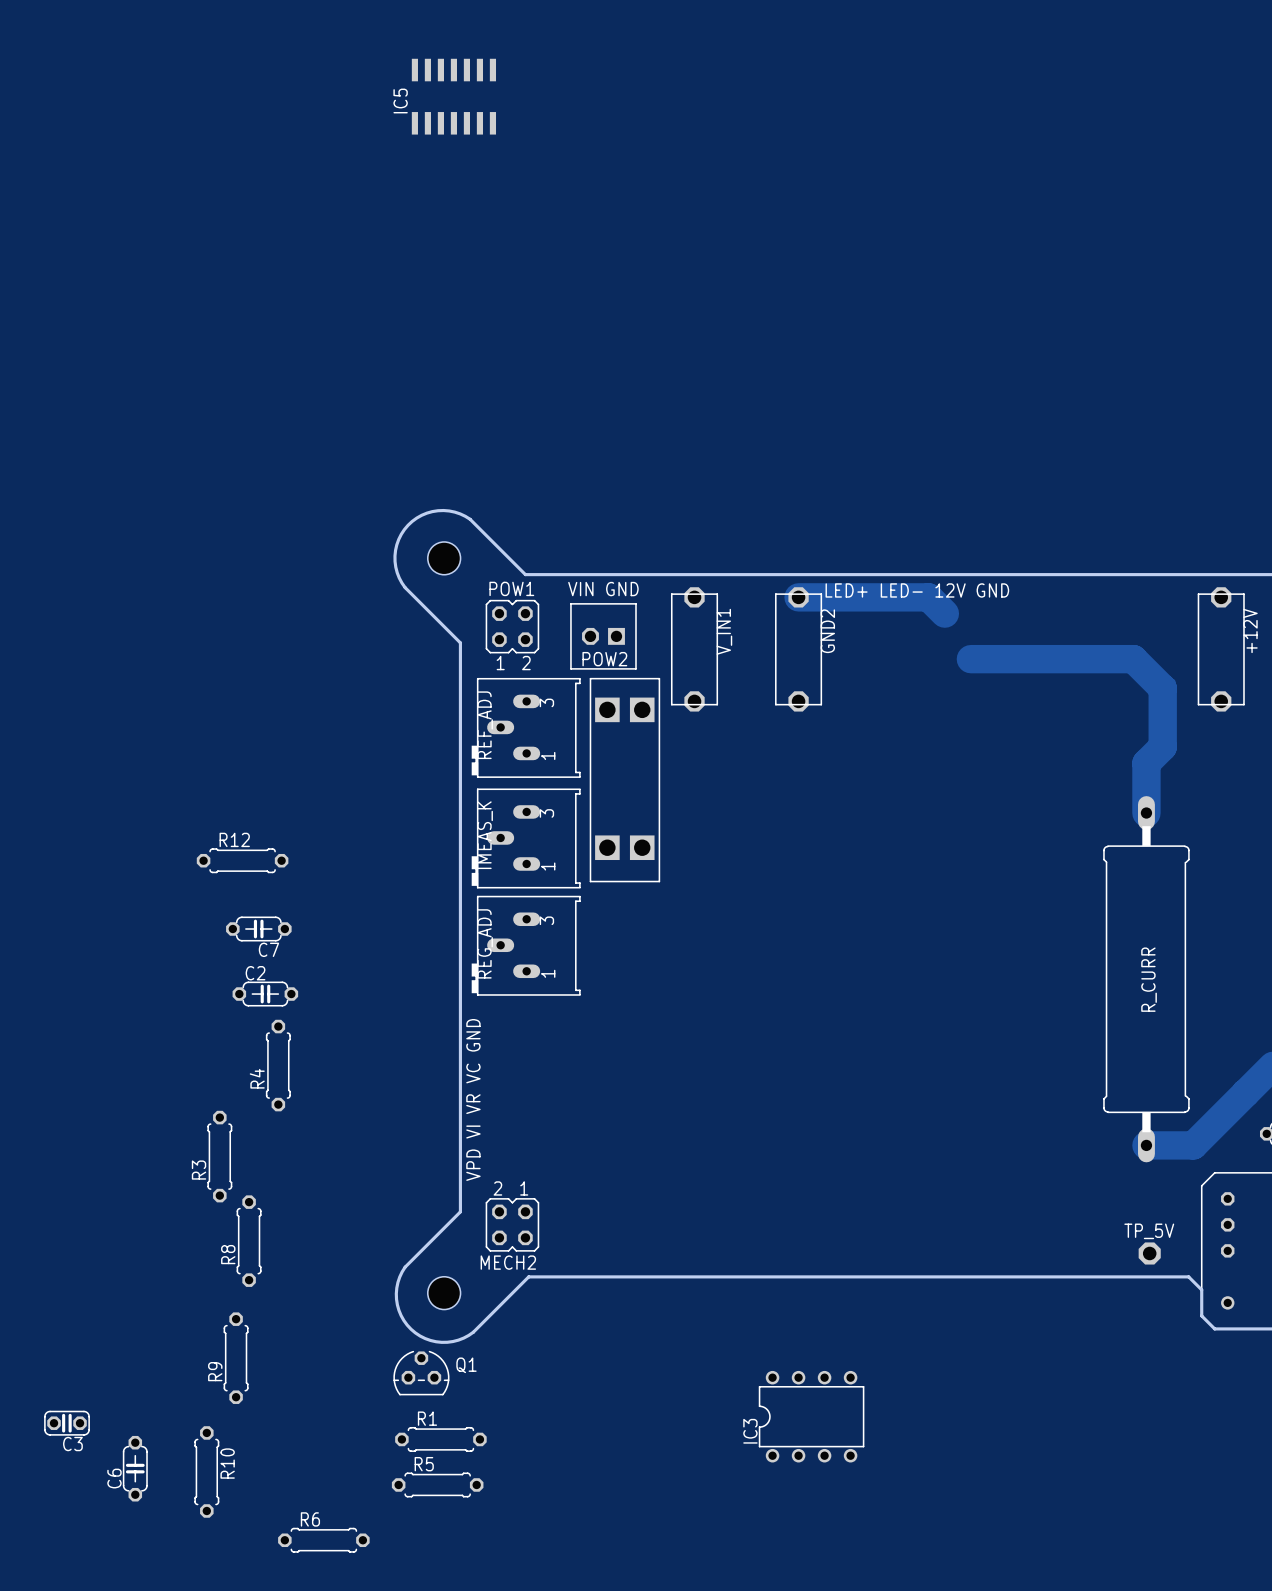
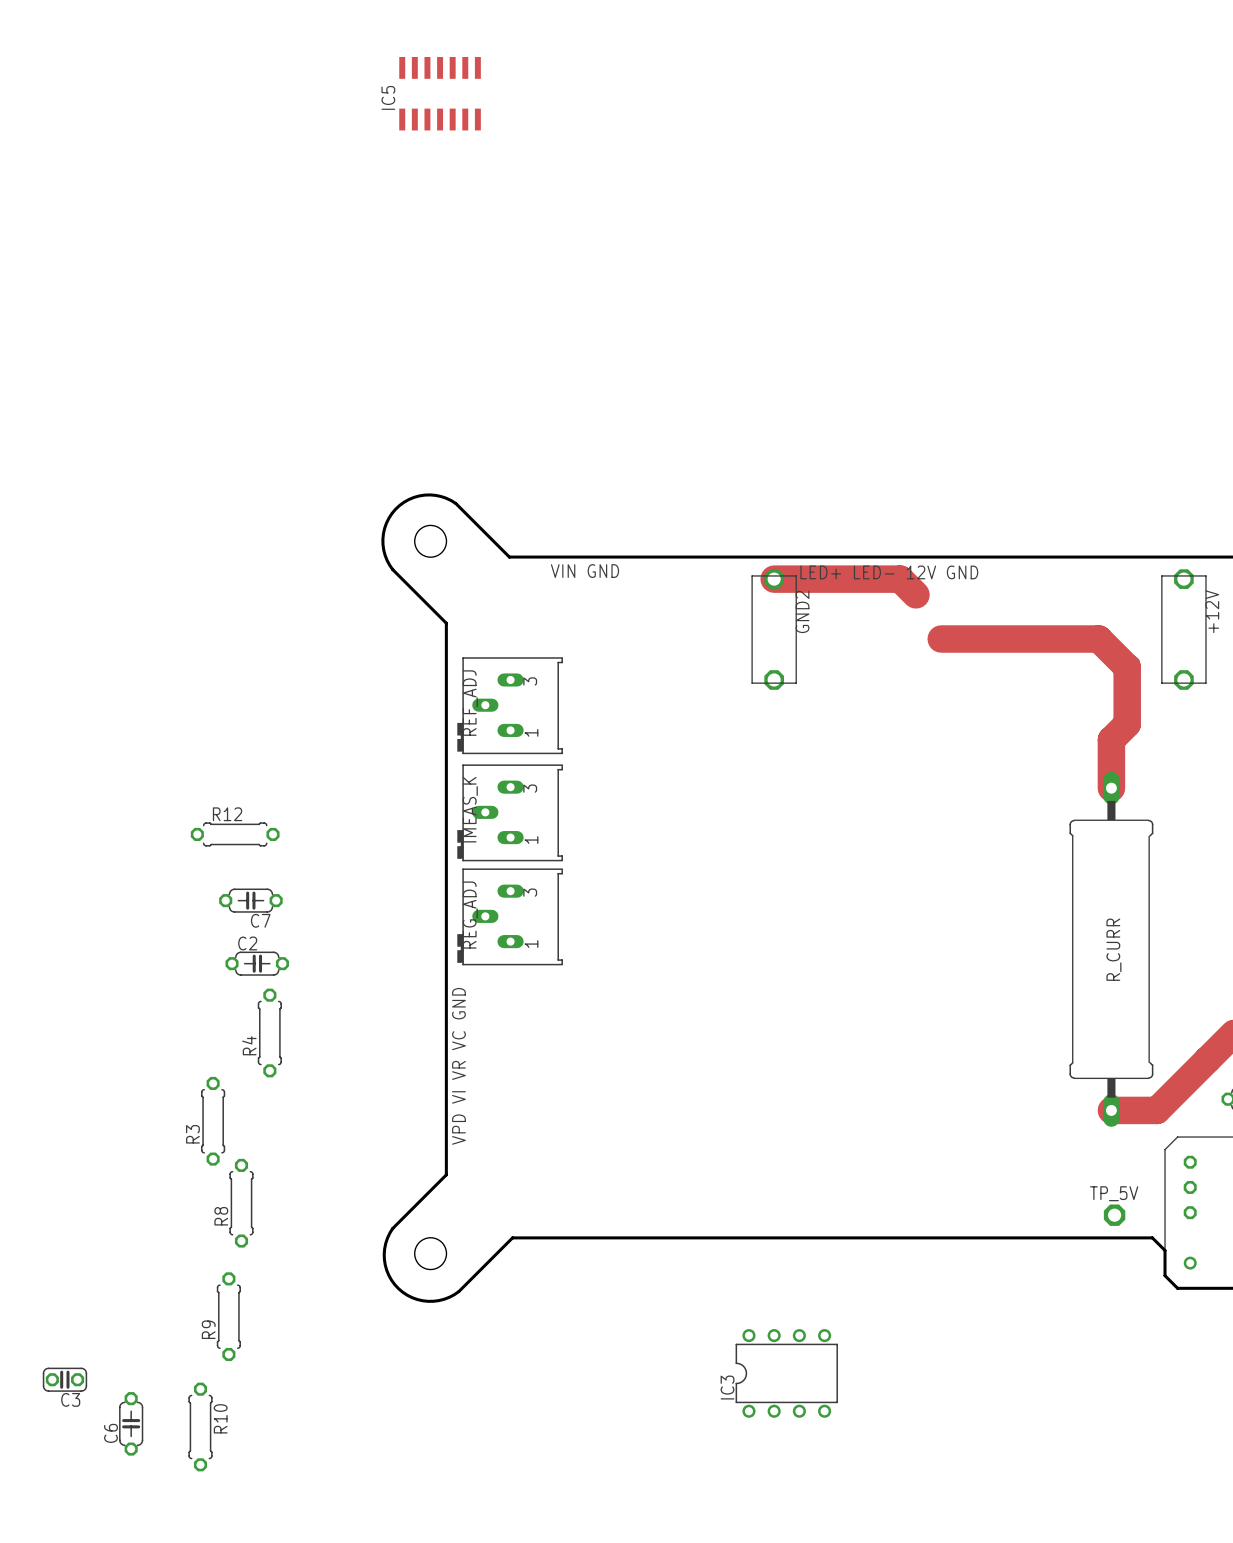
POW1: (512, 626) -> none
POW2: (603, 636) -> none
V_IN1: (694, 649) -> none
part: (624, 780) -> none
MECH2: (512, 1224) -> none
Q1: (421, 1373) -> none
R1: (440, 1439) -> none
R5: (437, 1484) -> none
R6: (323, 1540) -> none

